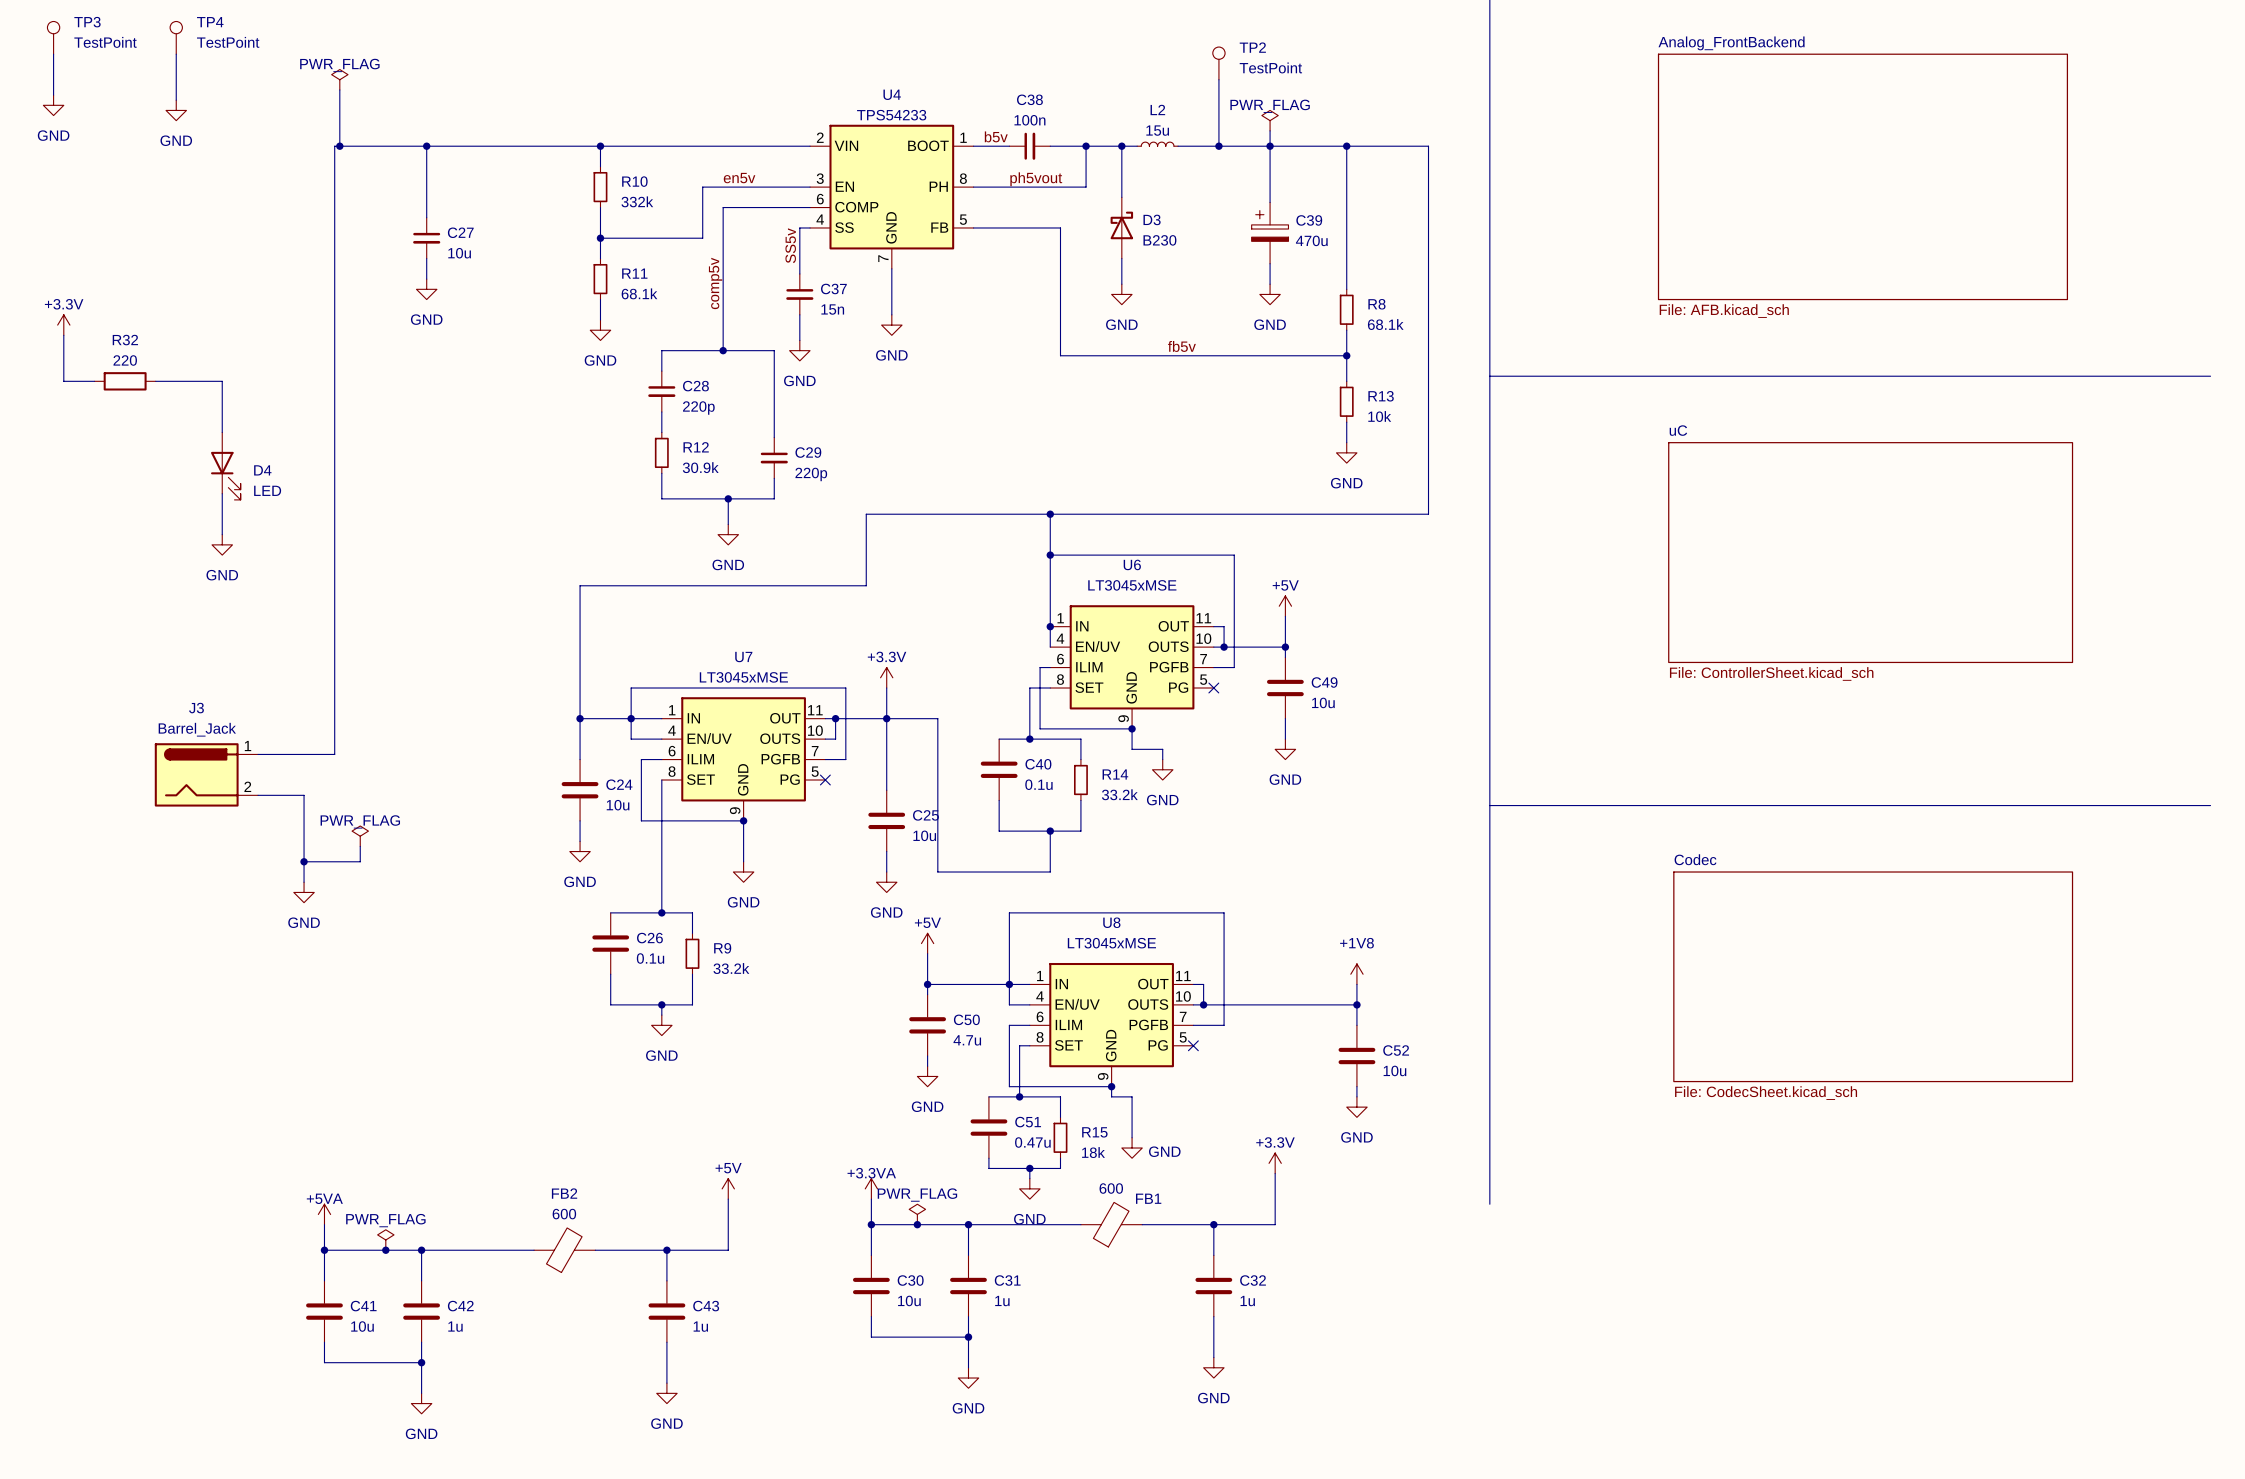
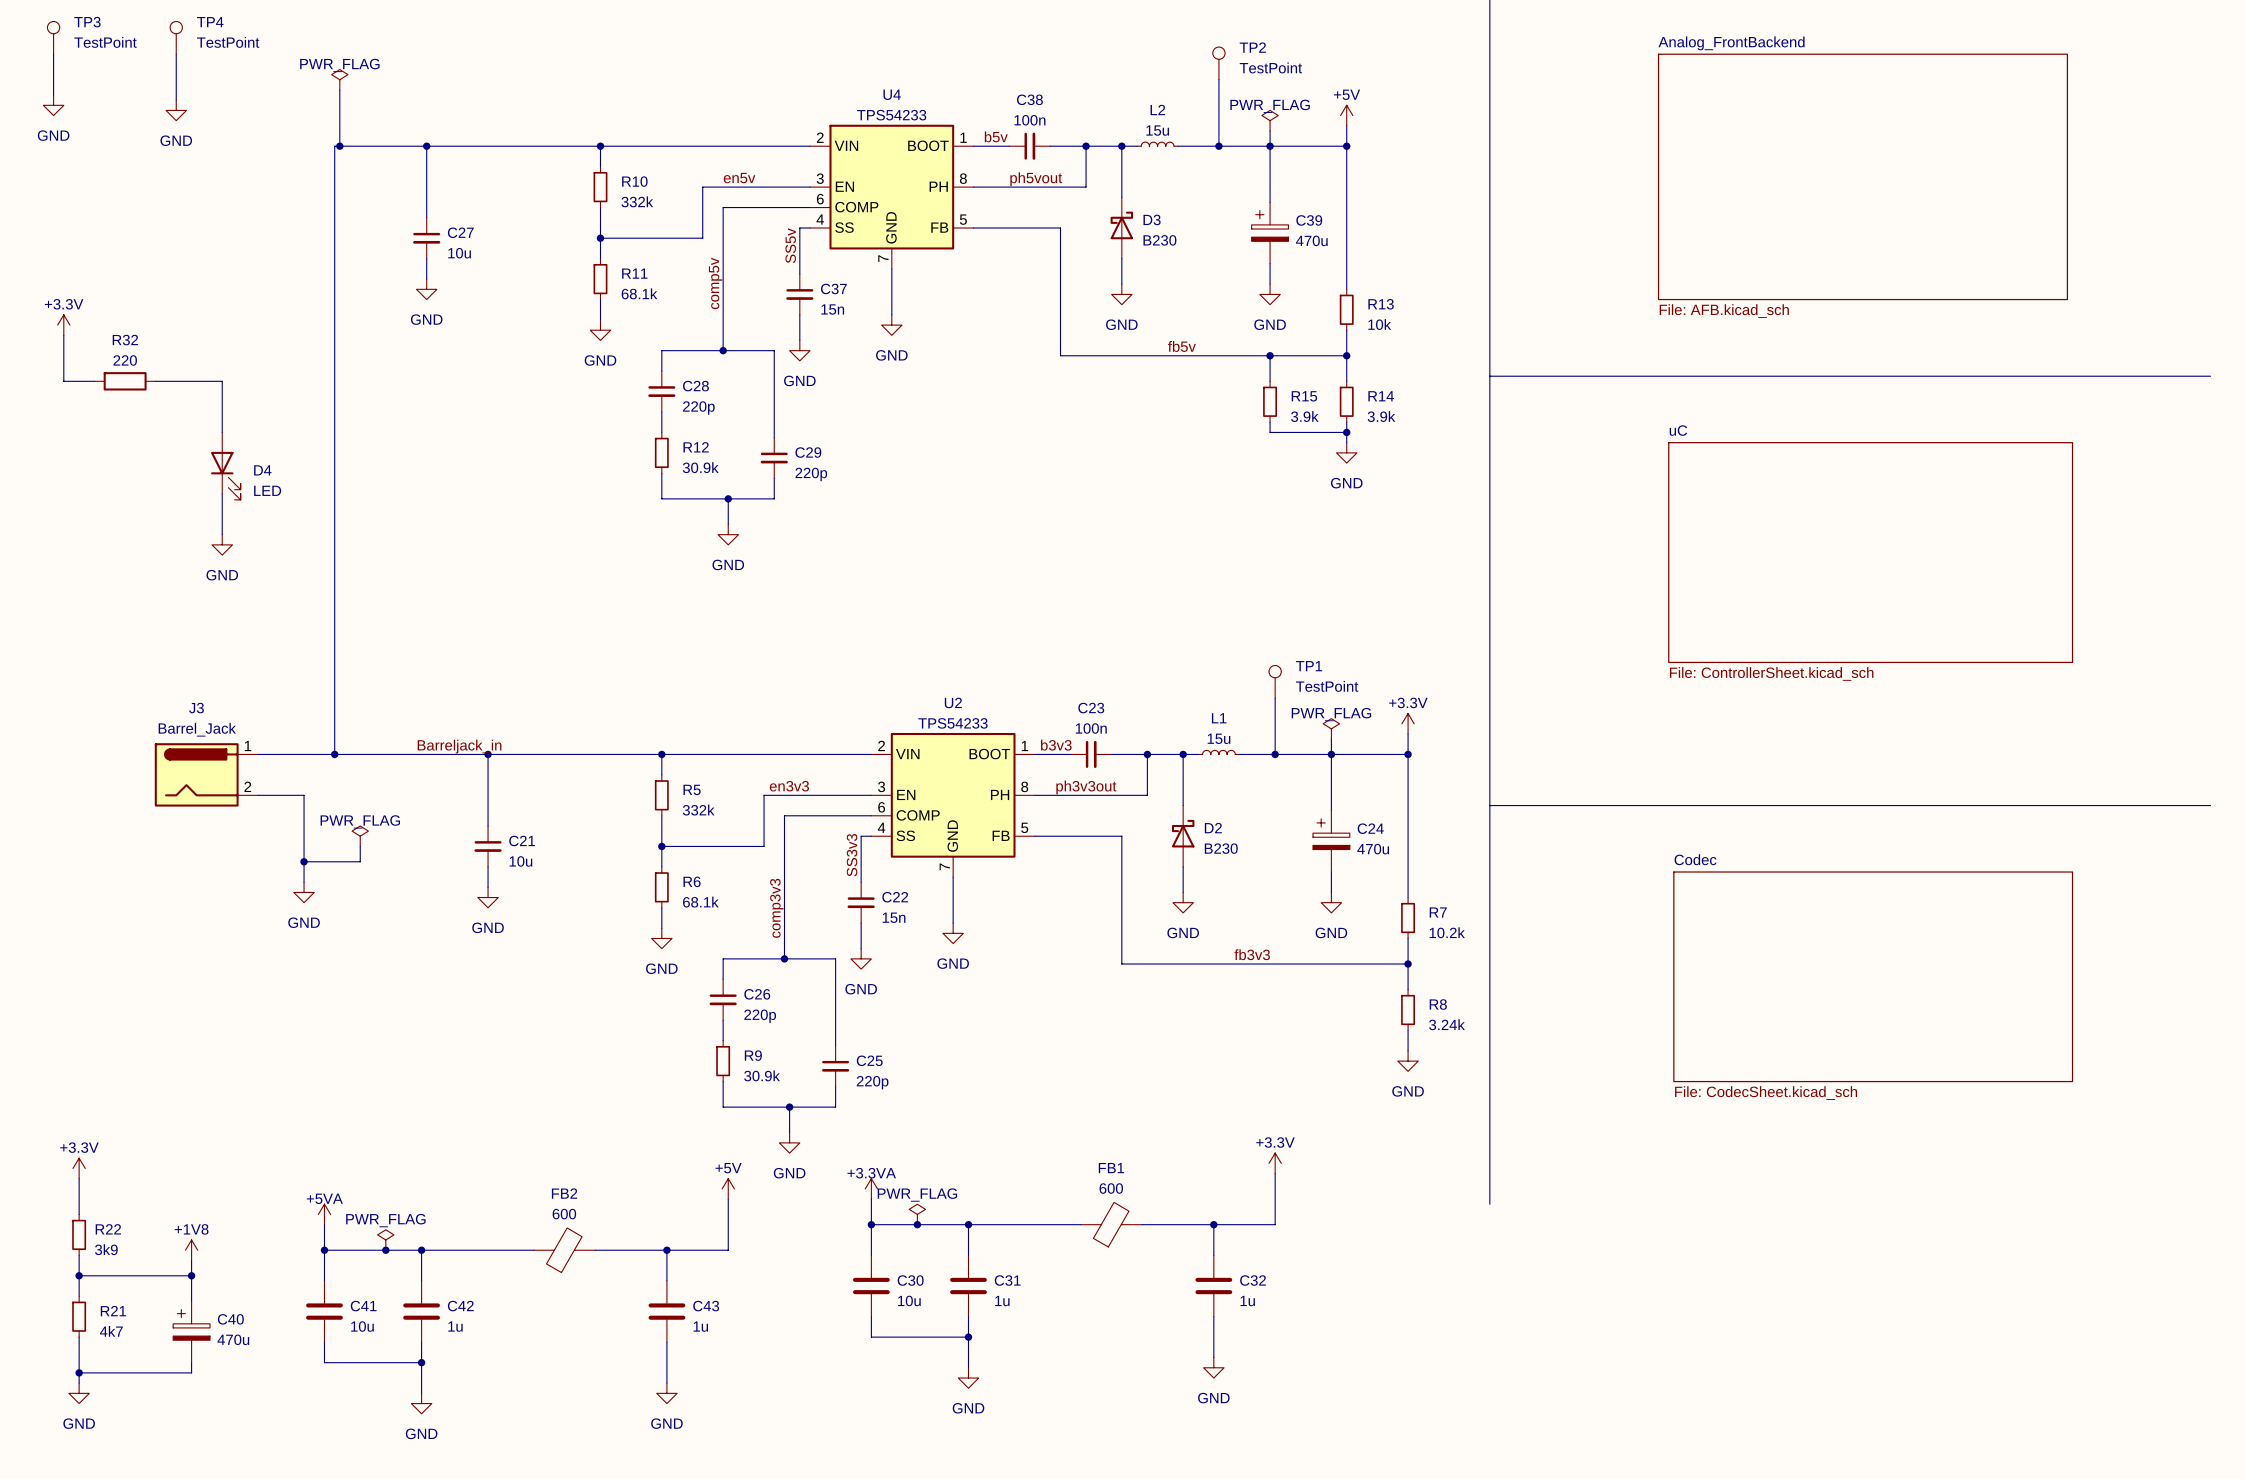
power symbol: none -> +5V (1346, 115)
wire: (1346, 146) (1428, 146) (1428, 514) (866, 514) (866, 585) (580, 585) (580, 759) -> (1346, 146) (1346, 125)
R8 name: R8 (1376, 304) -> R13 (1381, 304)
R8 value: 68.1k (1385, 324) -> 10k (1379, 324)
wire: none -> (1270, 355) (1270, 381)
junction: none -> (1270, 355)
R13 name: R13 (1381, 396) -> R14 (1381, 396)
R13 value: 10k (1379, 416) -> 3.9k (1381, 416)
wire: none -> (1270, 422) (1270, 432) (1346, 432)
junction: none -> (1346, 432)
wire: (1050, 514) (1050, 647) -> none
junction: (1050, 514) -> none
wire: (1050, 555) (1234, 555) (1234, 667) (1213, 667) -> none
junction: (1050, 555) -> none
power symbol: +5V (1285, 606) -> none
wire: (1285, 616) (1285, 657) -> none
junction: (1050, 626) -> none
wire: (1213, 626) (1224, 626) (1224, 647) -> none
wire: (1213, 647) (1285, 647) -> none
junction: (1224, 647) -> none
junction: (1285, 647) -> none
wire: (1050, 667) (1040, 667) (1040, 728) (1132, 728) (1132, 749) (1162, 749) (1162, 759) -> none
U6: LT3045xMSE (1132, 667) -> none
power symbol: +3.3V (886, 677) -> none
TP1: none -> TestPoint (1275, 681)
wire: (886, 688) (886, 790) -> none
wire: (1050, 688) (1029, 688) (1029, 739) -> none
no-connect mark: (1213, 688) -> none
C49: 10u (1285, 688) -> none
wire: none -> (1275, 698) (1275, 754)
wire: (580, 718) (661, 718) -> none
junction: (580, 718) -> none
junction: (631, 718) -> none
wire: (825, 718) (937, 718) (937, 872) (1050, 872) (1050, 831) -> none
wire: (835, 718) (835, 739) (825, 739) -> none
junction: (835, 718) -> none
junction: (886, 718) -> none
wire: (1285, 718) (1285, 739) -> (1331, 872) (1331, 892)
power symbol: none -> +3.3V (1408, 723)
junction: (1132, 728) -> none
power symbol: none -> PWR_FLAG (1331, 728)
wire: none -> (1408, 734) (1408, 897)
wire: (661, 739) (631, 739) (631, 688) (845, 688) (845, 759) (825, 759) -> none
C40 symbol: [980, 739, 1018, 801] -> [173, 1301, 210, 1363]
wire: (999, 739) (1080, 739) (1080, 759) -> none
junction: (1029, 739) -> none
wire: none -> (1331, 739) (1331, 810)
label: none -> b3v3 (1056, 745)
label: none -> Barreljack_in (459, 746)
power symbol: GND (1285, 749) -> none
L1: none -> 15u (1218, 752)
wire: none -> (334, 754) (871, 754)
junction: none -> (334, 754)
wire: none -> (488, 754) (488, 826)
junction: none -> (488, 754)
wire: none -> (661, 754) (661, 774)
junction: none -> (661, 754)
wire: none -> (1034, 754) (1070, 754)
C23: none -> 100n (1091, 754)
wire: none -> (1111, 754) (1198, 754)
wire: none -> (1147, 754) (1147, 795) (1034, 795)
junction: none -> (1147, 754)
wire: none -> (1183, 754) (1183, 805)
junction: none -> (1183, 754)
wire: none -> (1239, 754) (1408, 754)
junction: none -> (1275, 754)
junction: none -> (1331, 754)
junction: none -> (1408, 754)
C24 symbol: [561, 759, 599, 821] -> [1312, 810, 1350, 873]
wire: (661, 759) (641, 759) (641, 820) (743, 820) (743, 861) -> none
U7: LT3045xMSE (743, 759) -> none
power symbol: GND (1162, 769) -> none
wire: (661, 780) (661, 815) -> none
no-connect mark: (825, 780) -> none
R14: 33.2k (1080, 780) -> none
C40 value: 0.1u (1038, 784) -> 470u (233, 1339)
label: none -> en3v3 (789, 786)
label: none -> ph3v3out (1086, 787)
C25 symbol: [868, 790, 906, 852] -> [822, 1045, 850, 1087]
R5: none -> 332k (661, 795)
wire: none -> (871, 795) (764, 795) (764, 846) (661, 846)
wire: (999, 800) (999, 831) (1080, 831) (1080, 800) -> none
C24 value: 10u (618, 805) -> 470u (1373, 849)
U2: none -> TPS54233 (953, 805)
wire: none -> (871, 815) (784, 815) (784, 958)
wire: (580, 820) (580, 841) -> (488, 866) (488, 887)
junction: (743, 820) -> none
junction: (1050, 831) -> none
C25 value: 10u (924, 835) -> 220p (872, 1082)
wire: none -> (871, 836) (861, 836) (861, 882)
wire: none -> (1034, 836) (1121, 836) (1121, 964) (1408, 964)
D2: none -> B230 (1183, 836)
C21: none -> 10u (488, 846)
junction: none -> (661, 846)
power symbol: GND (580, 851) -> none
wire: (886, 851) (886, 872) -> none
label: none -> SS3v3 (852, 855)
wire: (661, 866) (661, 907) -> none
wire: none -> (1183, 866) (1183, 892)
power symbol: GND (743, 872) -> none
wire: none -> (953, 877) (953, 923)
power symbol: GND (886, 882) -> none
R6: none -> 68.1k (661, 887)
power symbol: none -> GND (488, 897)
C22: none -> 15n (861, 902)
power symbol: none -> GND (1183, 902)
power symbol: none -> GND (1331, 902)
label: none -> comp3v3 (776, 908)
C26 symbol: [592, 912, 630, 975] -> [709, 979, 737, 1021]
wire: (610, 912) (692, 912) (692, 933) -> none
wire: none -> (661, 912) (661, 928)
junction: (661, 912) -> none
R7: none -> 10.2k (1408, 918)
wire: none -> (861, 923) (861, 948)
power symbol: none -> GND (953, 933)
power symbol: none -> GND (661, 938)
wire: none -> (1408, 938) (1408, 989)
power symbol: +5V (927, 943) -> none
R9 position: (692, 953) -> (723, 1061)
wire: (927, 953) (927, 994) -> none
label: none -> fb3v3 (1252, 954)
C26 value: 0.1u (650, 958) -> 220p (760, 1016)
junction: none -> (784, 958)
power symbol: none -> GND (861, 958)
junction: none -> (1408, 964)
R9 value: 33.2k (731, 968) -> 30.9k (762, 1075)
wire: (610, 974) (610, 1004) (692, 1004) (692, 974) -> none
power symbol: +1V8 (1356, 974) -> none
wire: none -> (723, 979) (723, 958) (835, 958) (835, 1045)
wire: (927, 984) (1029, 984) -> none
junction: (927, 984) -> none
junction: (1009, 984) -> none
wire: (1193, 984) (1203, 984) (1203, 1004) -> none
wire: (1356, 984) (1356, 1025) -> none
wire: (661, 1004) (661, 1015) -> none
junction: (661, 1004) -> none
wire: (1029, 1004) (1009, 1004) (1009, 912) (1224, 912) (1224, 1025) (1193, 1025) -> none
wire: (1193, 1004) (1356, 1004) -> none
junction: (1203, 1004) -> none
junction: (1356, 1004) -> none
R8: none -> 3.24k (1408, 1010)
wire: none -> (723, 1020) (723, 1040)
U8: LT3045xMSE (1111, 1024) -> none
power symbol: GND (661, 1025) -> none
C50: 4.7u (927, 1025) -> none
wire: (1029, 1025) (1009, 1025) (1009, 1086) (1111, 1086) (1111, 1096) (1132, 1096) (1132, 1137) -> none
wire: none -> (1408, 1030) (1408, 1050)
wire: (1029, 1045) (1019, 1045) (1019, 1096) -> none
no-connect mark: (1193, 1045) -> none
wire: (927, 1056) (927, 1066) -> none
C52: 10u (1356, 1056) -> none
power symbol: GND (927, 1076) -> none
wire: none -> (723, 1081) (723, 1107) (835, 1107) (835, 1086)
junction: (1111, 1086) -> none
wire: (1356, 1086) (1356, 1096) -> none
wire: (988, 1096) (1060, 1096) (1060, 1117) -> none
junction: (1019, 1096) -> none
wire: none -> (789, 1107) (789, 1132)
junction: none -> (789, 1107)
power symbol position: GND (1356, 1107) -> GND (1408, 1061)
C51: 0.47u (988, 1127) -> none
R15 position: (1060, 1137) -> (1270, 401)
power symbol: none -> GND (789, 1142)
power symbol: GND (1132, 1148) -> none
R15 value: 18k (1093, 1152) -> 3.9k (1304, 416)
wire: (988, 1158) (988, 1168) (1060, 1168) (1060, 1158) -> none
power symbol: none -> +3.3V (79, 1168)
wire: (1029, 1168) (1029, 1178) -> none
junction: (1029, 1168) -> none
wire: none -> (79, 1178) (79, 1214)
power symbol: GND (1029, 1188) -> none
FB1 name position: FB1 (1148, 1198) -> FB1 (1111, 1168)
R22: none -> 3k9 (79, 1234)
power symbol: none -> +1V8 (191, 1250)
wire: none -> (79, 1255) (79, 1296)
wire: none -> (191, 1260) (191, 1301)
wire: none -> (79, 1275) (191, 1275)
junction: none -> (79, 1275)
junction: none -> (191, 1275)
R21: none -> 4k7 (79, 1316)
wire: none -> (79, 1337) (79, 1383)
wire: none -> (191, 1362) (191, 1372) (79, 1372)
junction: none -> (79, 1372)
power symbol: none -> GND (79, 1393)

